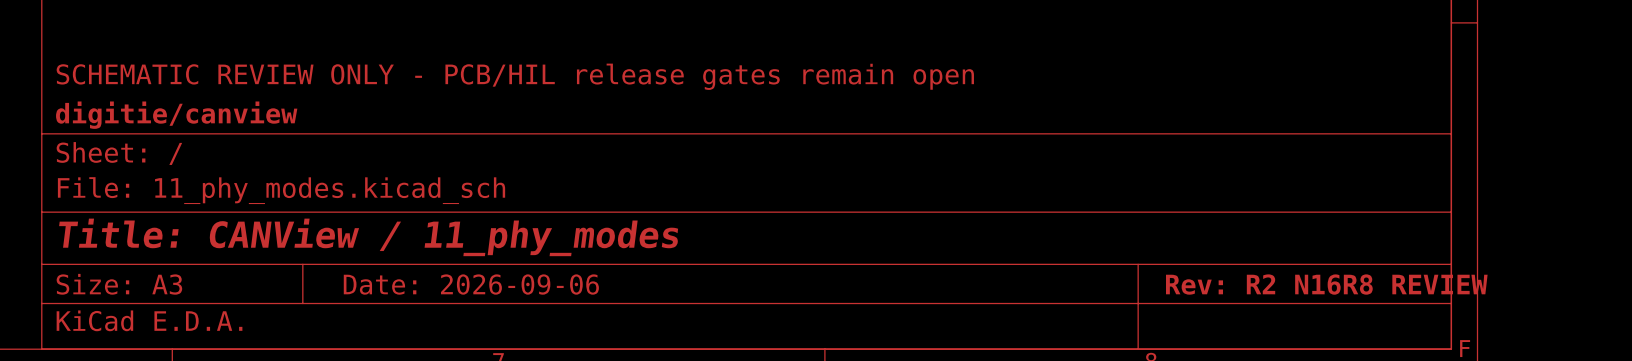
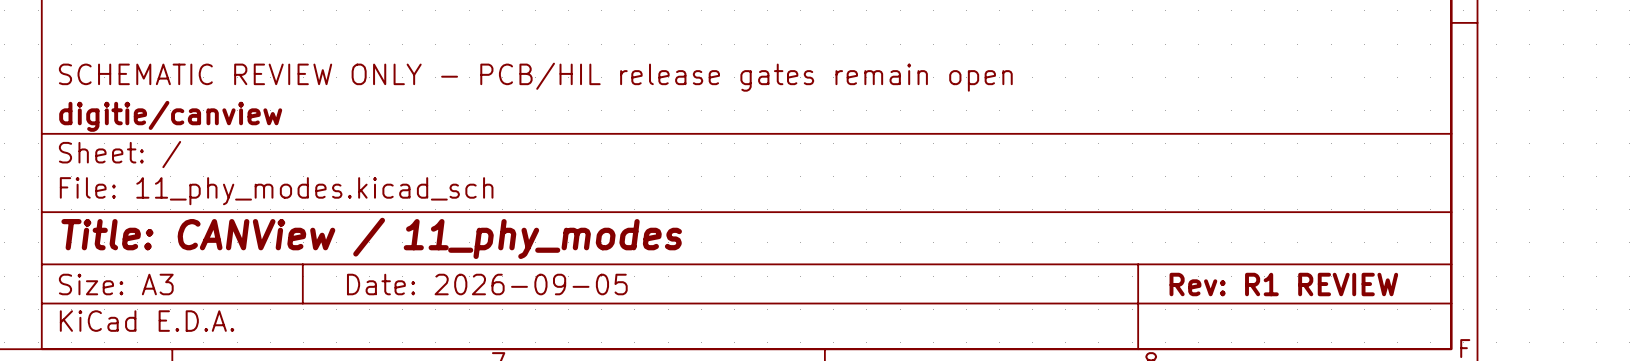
title block: Date: 2026-09-06 (471, 284) -> Date: 2026-09-05 (487, 284)
title block: Rev: R2 N16R8 REVIEW (1326, 284) -> Rev: R1 REVIEW (1283, 284)

